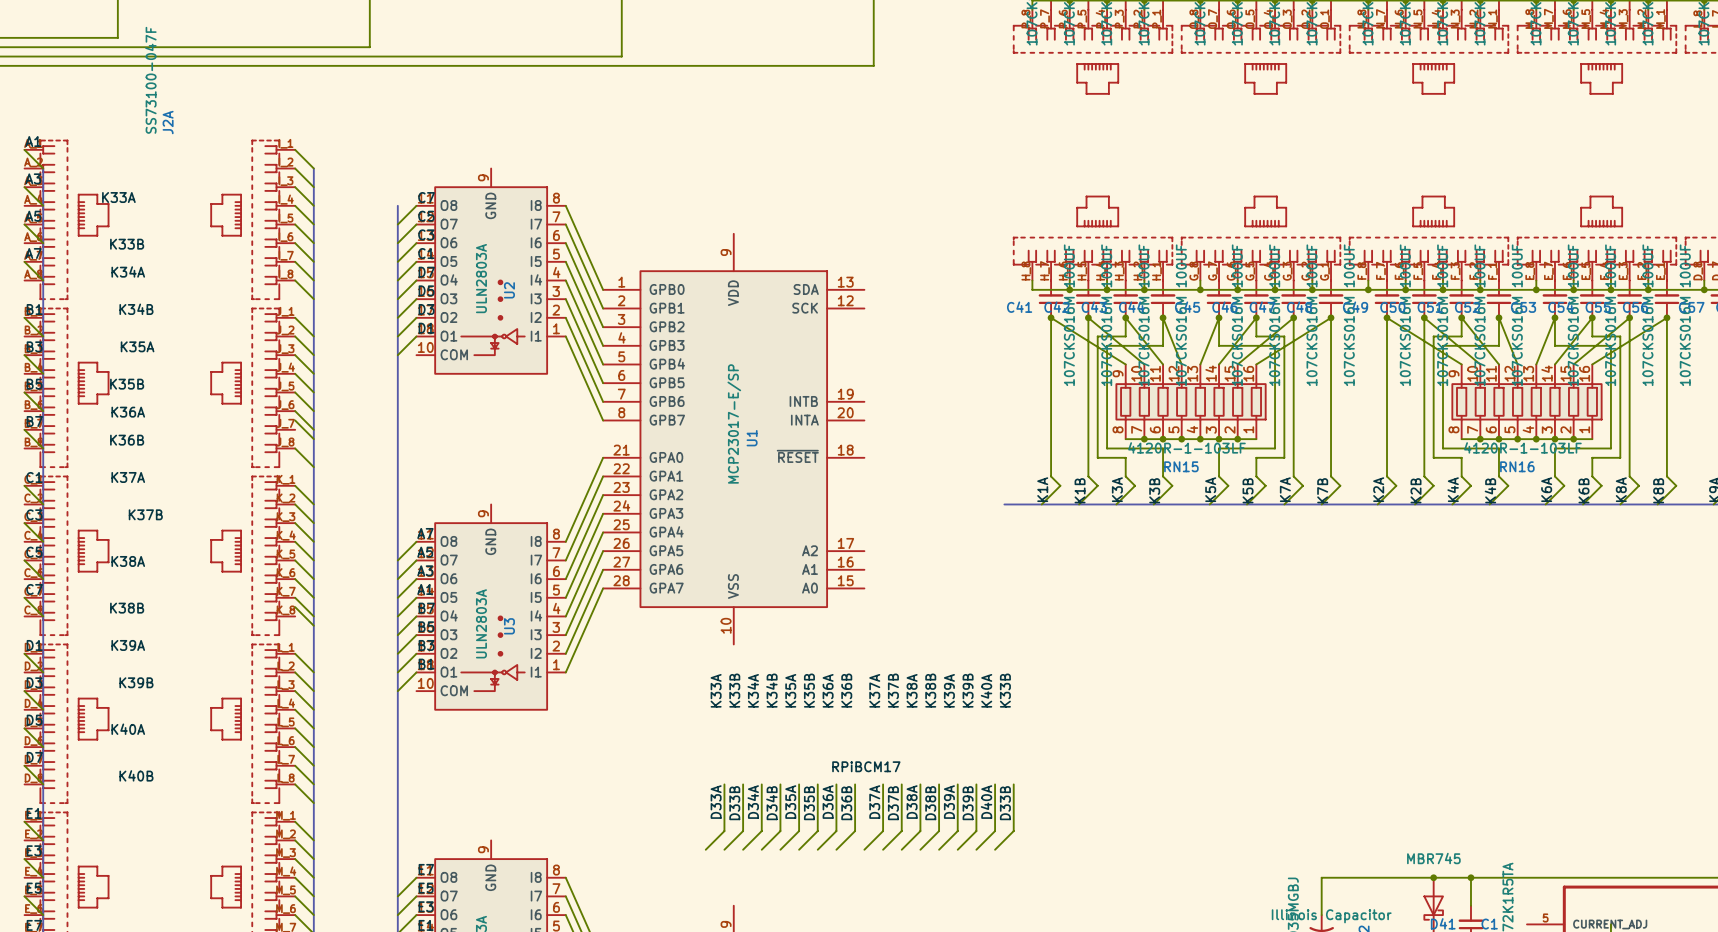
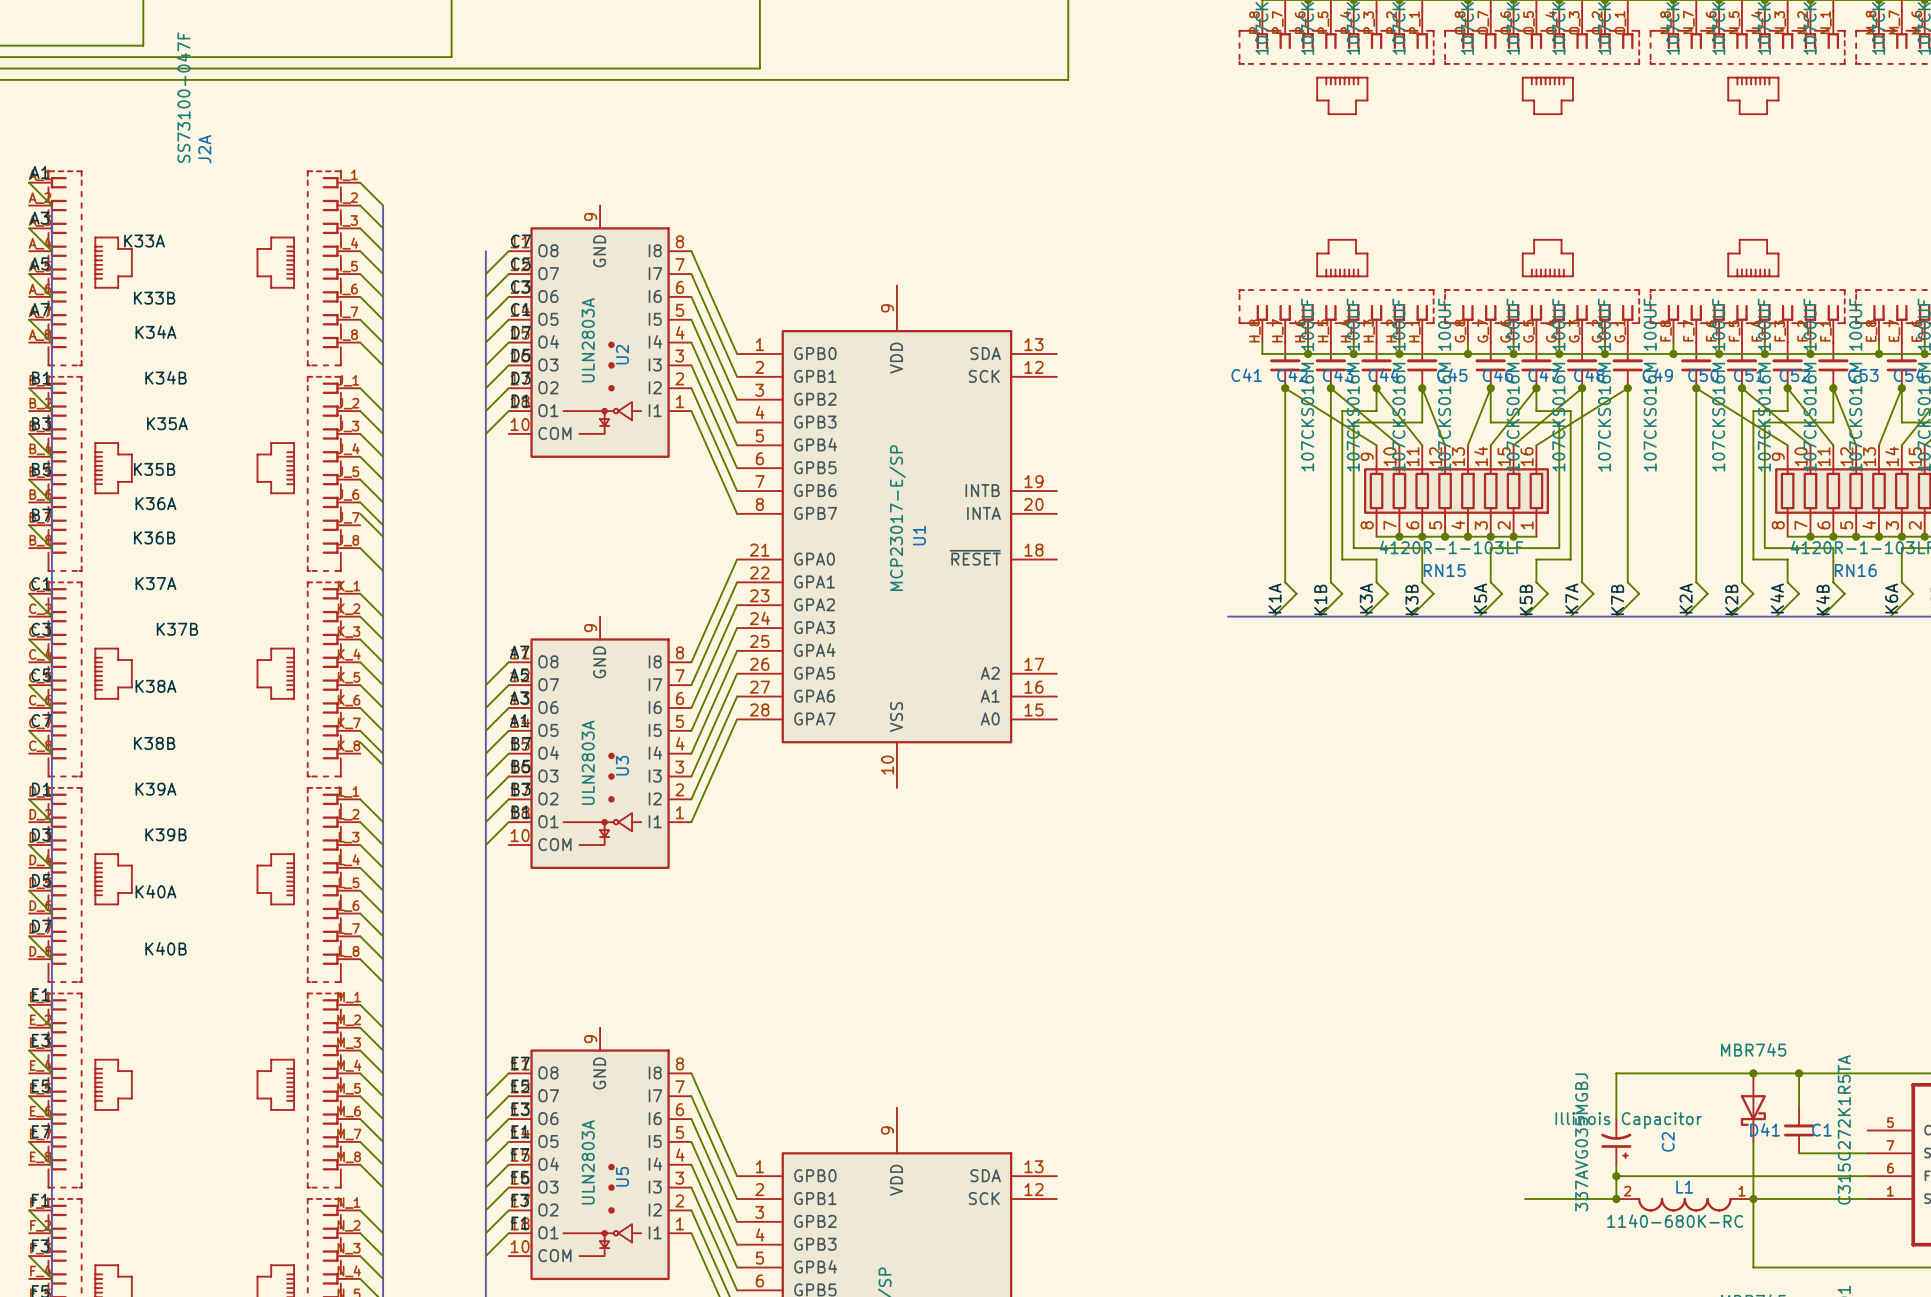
label: K33A (716, 690) -> none
label: K33B (734, 690) -> none
label: K34A (753, 690) -> none
label: K34B (771, 690) -> none
label: K35A (790, 690) -> none
label: K35B (809, 690) -> none
label: K36A (828, 690) -> none
label: K36B (846, 690) -> none
label: K37A (874, 690) -> none
label: K37B (893, 690) -> none
label: K38A (912, 690) -> none
label: K38B (930, 690) -> none
label: K39A (949, 690) -> none
label: K39B (968, 690) -> none
label: K40A (986, 690) -> none
label: K33B (1005, 690) -> none
label: RPiBCM17 (866, 766) -> none
wire: (724, 784) (724, 831) (705, 849) -> none
wire: (743, 784) (743, 831) (724, 849) -> none
wire: (761, 784) (761, 831) (743, 849) -> none
wire: (780, 784) (780, 831) (761, 849) -> none
wire: (799, 784) (799, 831) (780, 849) -> none
wire: (817, 784) (817, 831) (799, 849) -> none
wire: (836, 784) (836, 831) (817, 849) -> none
wire: (855, 784) (855, 831) (836, 849) -> none
wire: (883, 784) (883, 831) (864, 849) -> none
wire: (901, 784) (901, 831) (883, 849) -> none
wire: (920, 784) (920, 831) (901, 849) -> none
wire: (939, 784) (939, 831) (920, 849) -> none
wire: (957, 784) (957, 831) (939, 849) -> none
wire: (976, 784) (976, 831) (957, 849) -> none
wire: (995, 784) (995, 831) (976, 849) -> none
wire: (1013, 784) (1013, 831) (995, 849) -> none
label: D33A (716, 802) -> none
label: D34A (753, 802) -> none
label: D35A (790, 802) -> none
label: D36A (828, 802) -> none
label: D37A (874, 802) -> none
label: D38A (912, 802) -> none
label: D39A (949, 802) -> none
label: D40A (986, 802) -> none
label: D33B (734, 803) -> none
label: D34B (771, 803) -> none
label: D35B (809, 803) -> none
label: D36B (846, 803) -> none
label: D37B (893, 803) -> none
label: D38B (930, 803) -> none
label: D39B (968, 803) -> none
label: D33B (1005, 803) -> none

